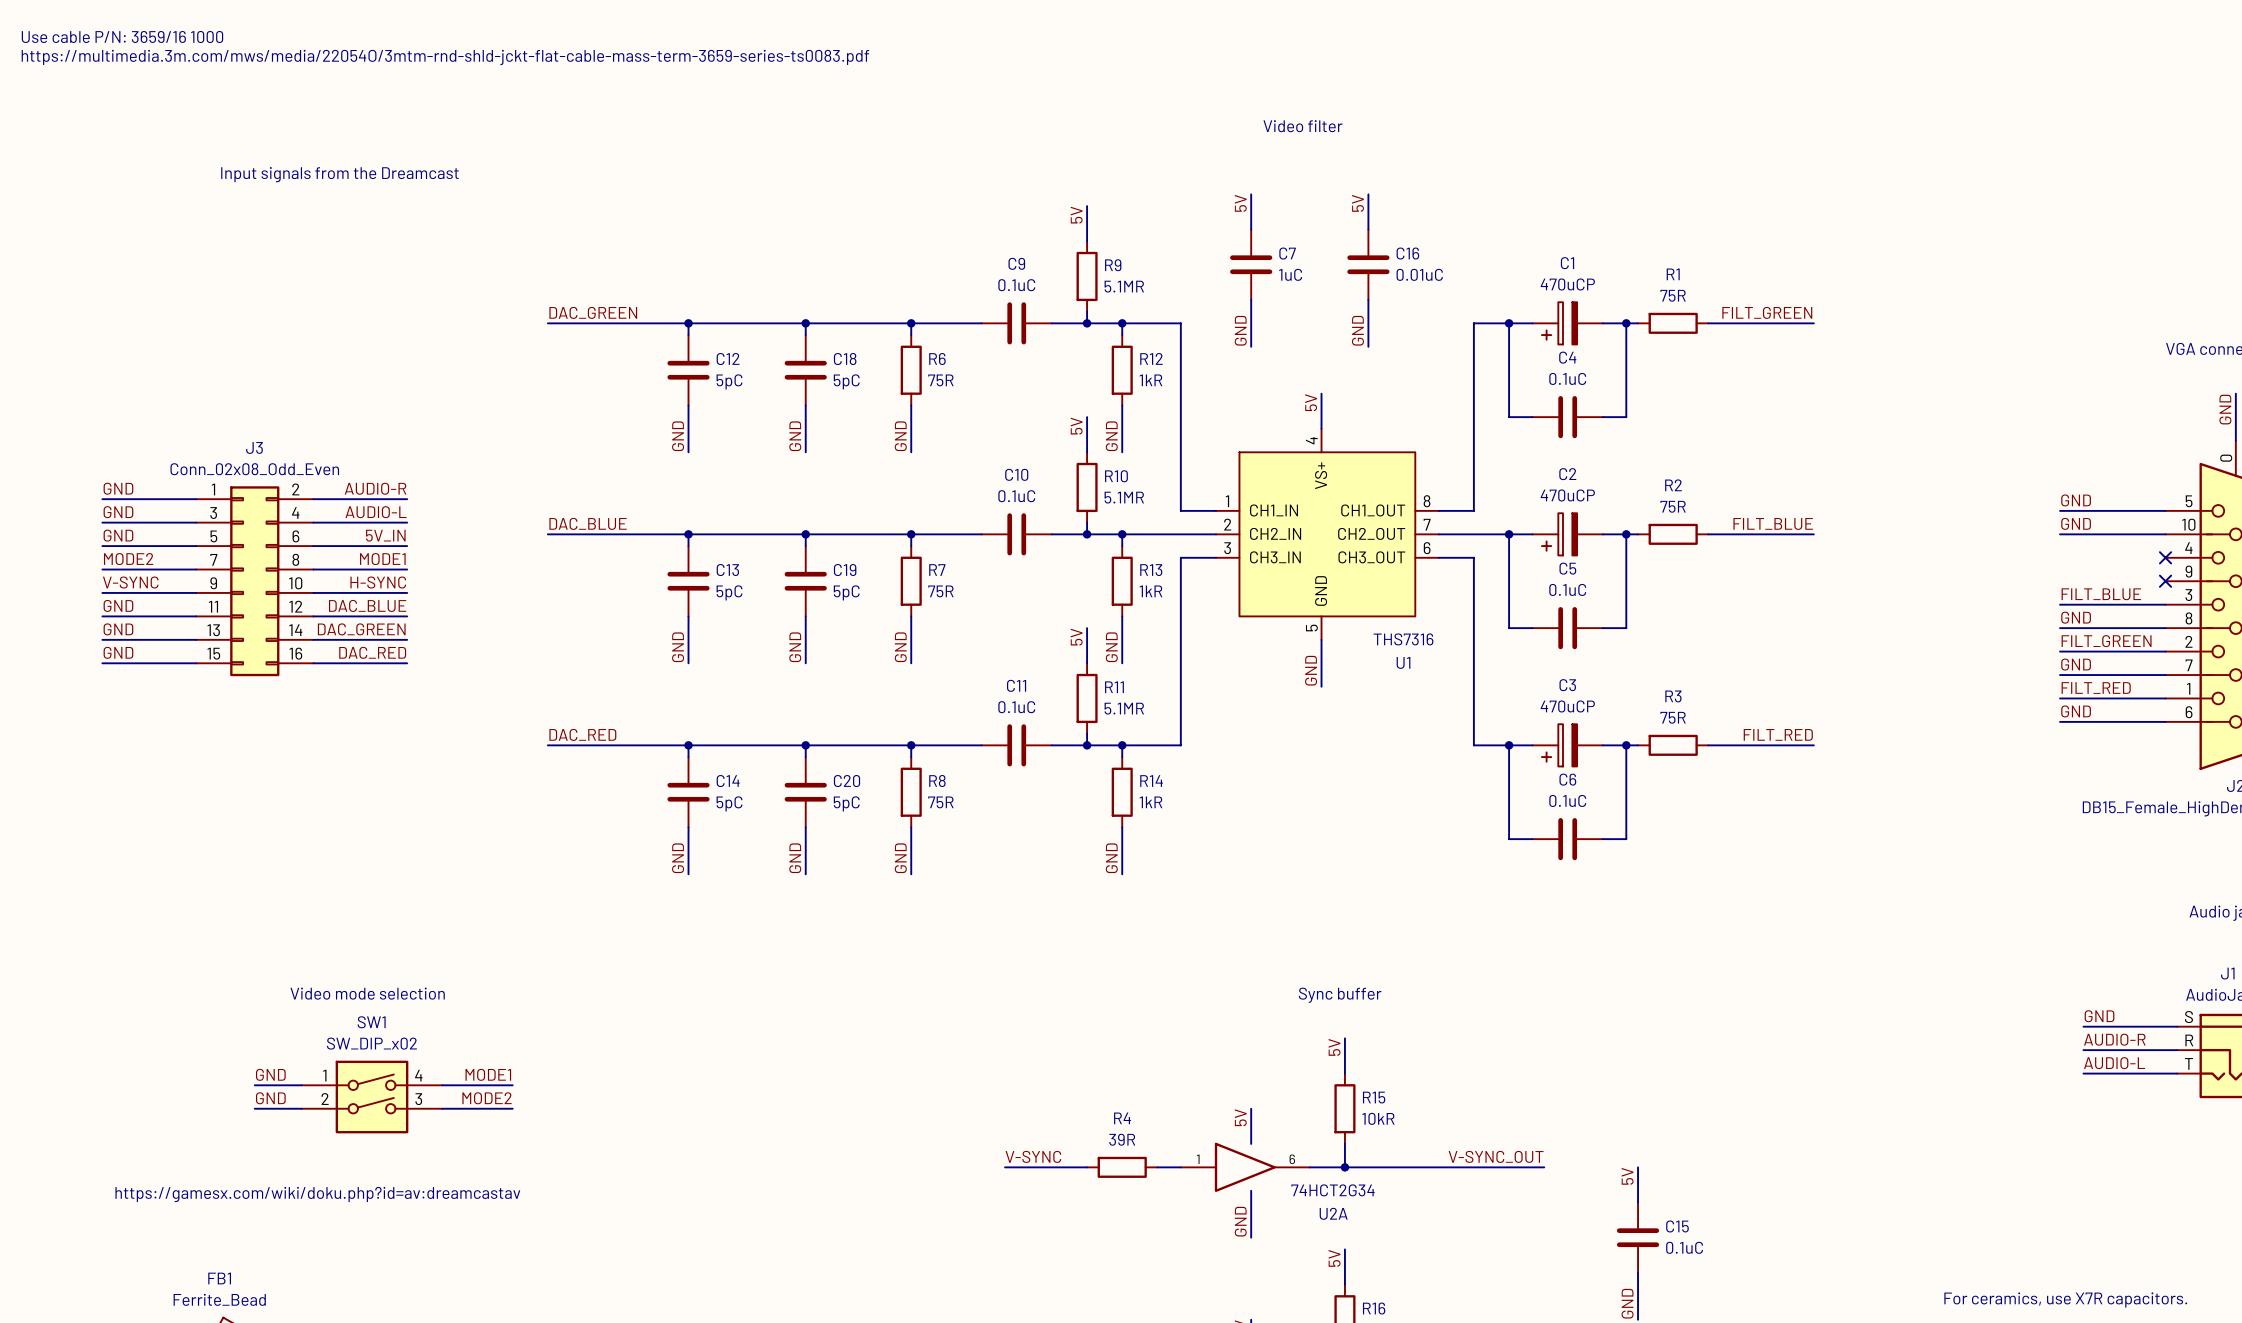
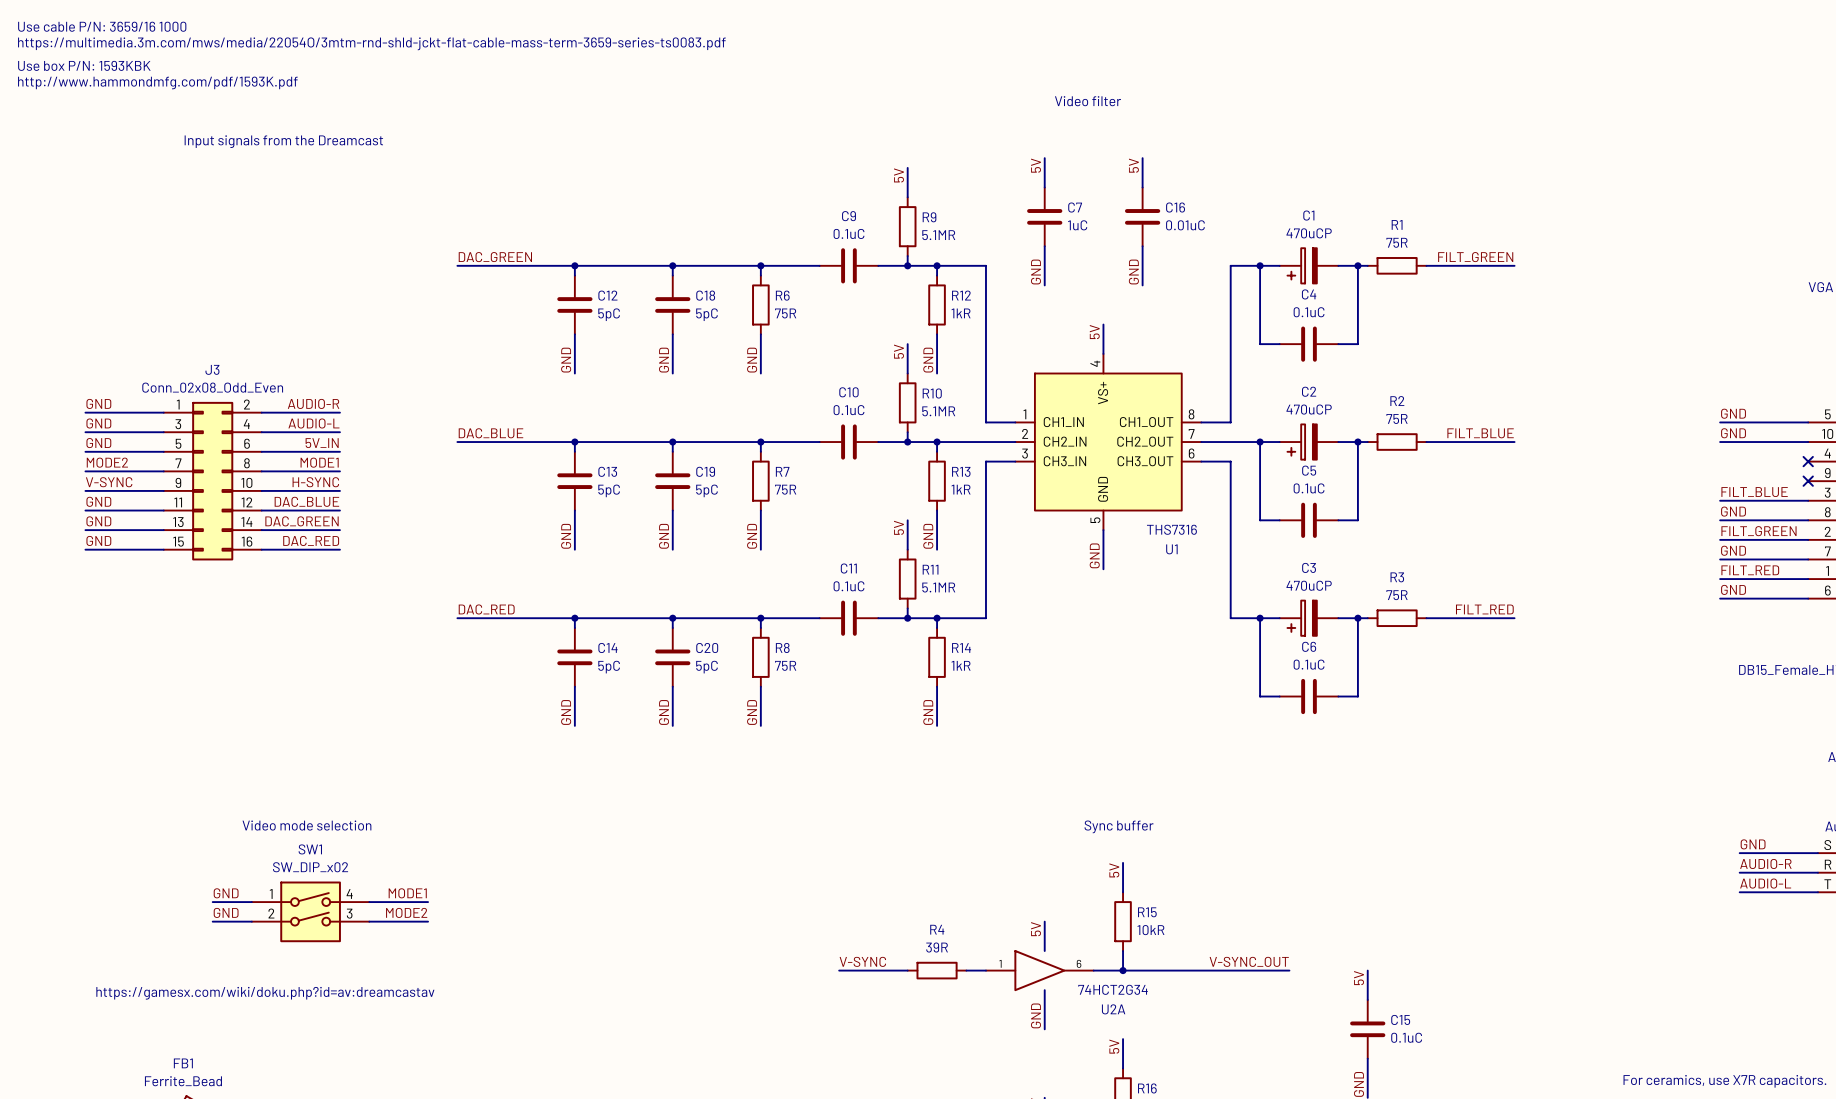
text: none -> Use box P/N: 1593KBK (84, 65)
text: none -> http://www.hammondmfg.com/pdf/1593K.pdf (157, 82)

